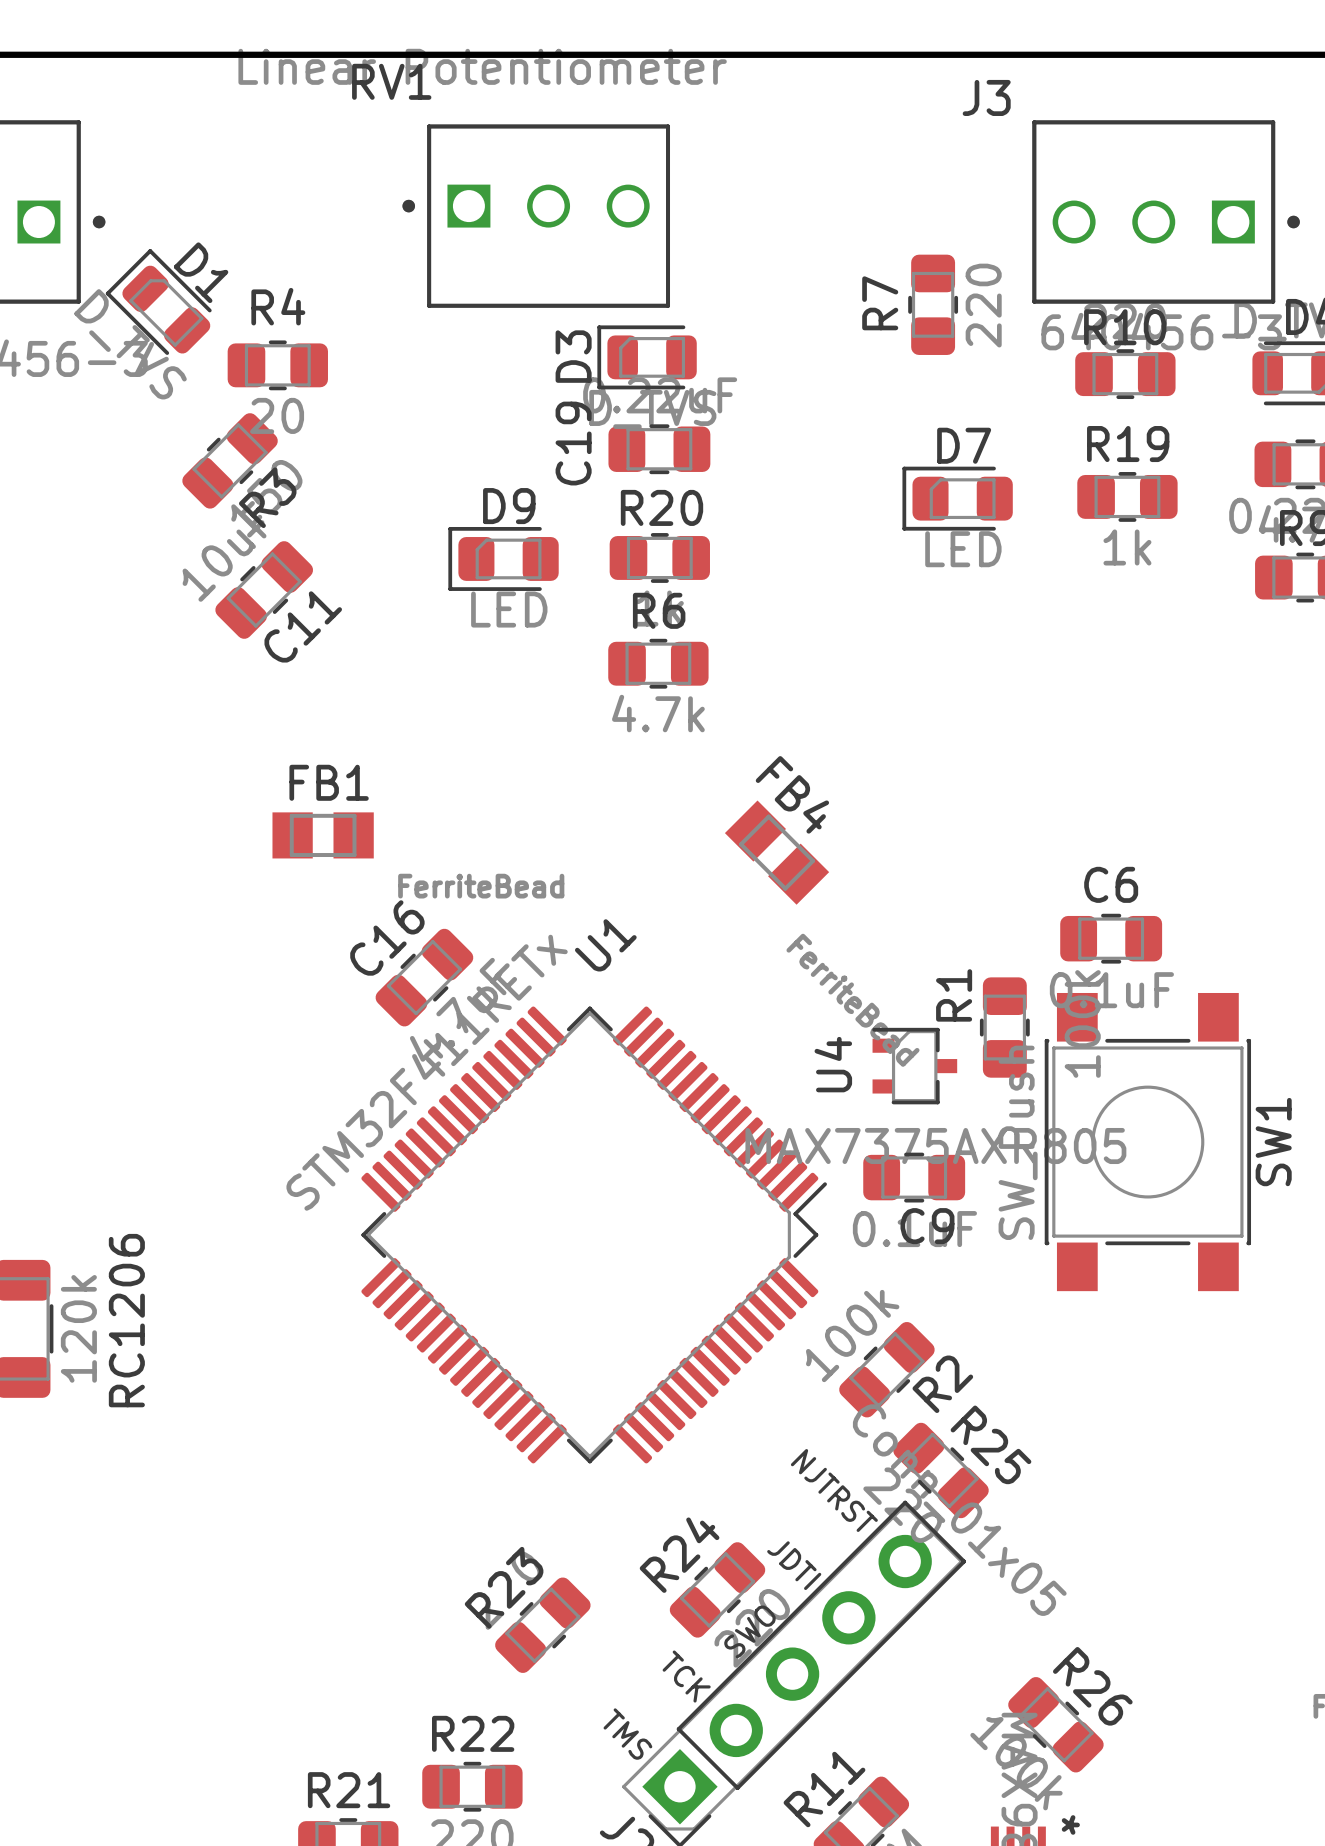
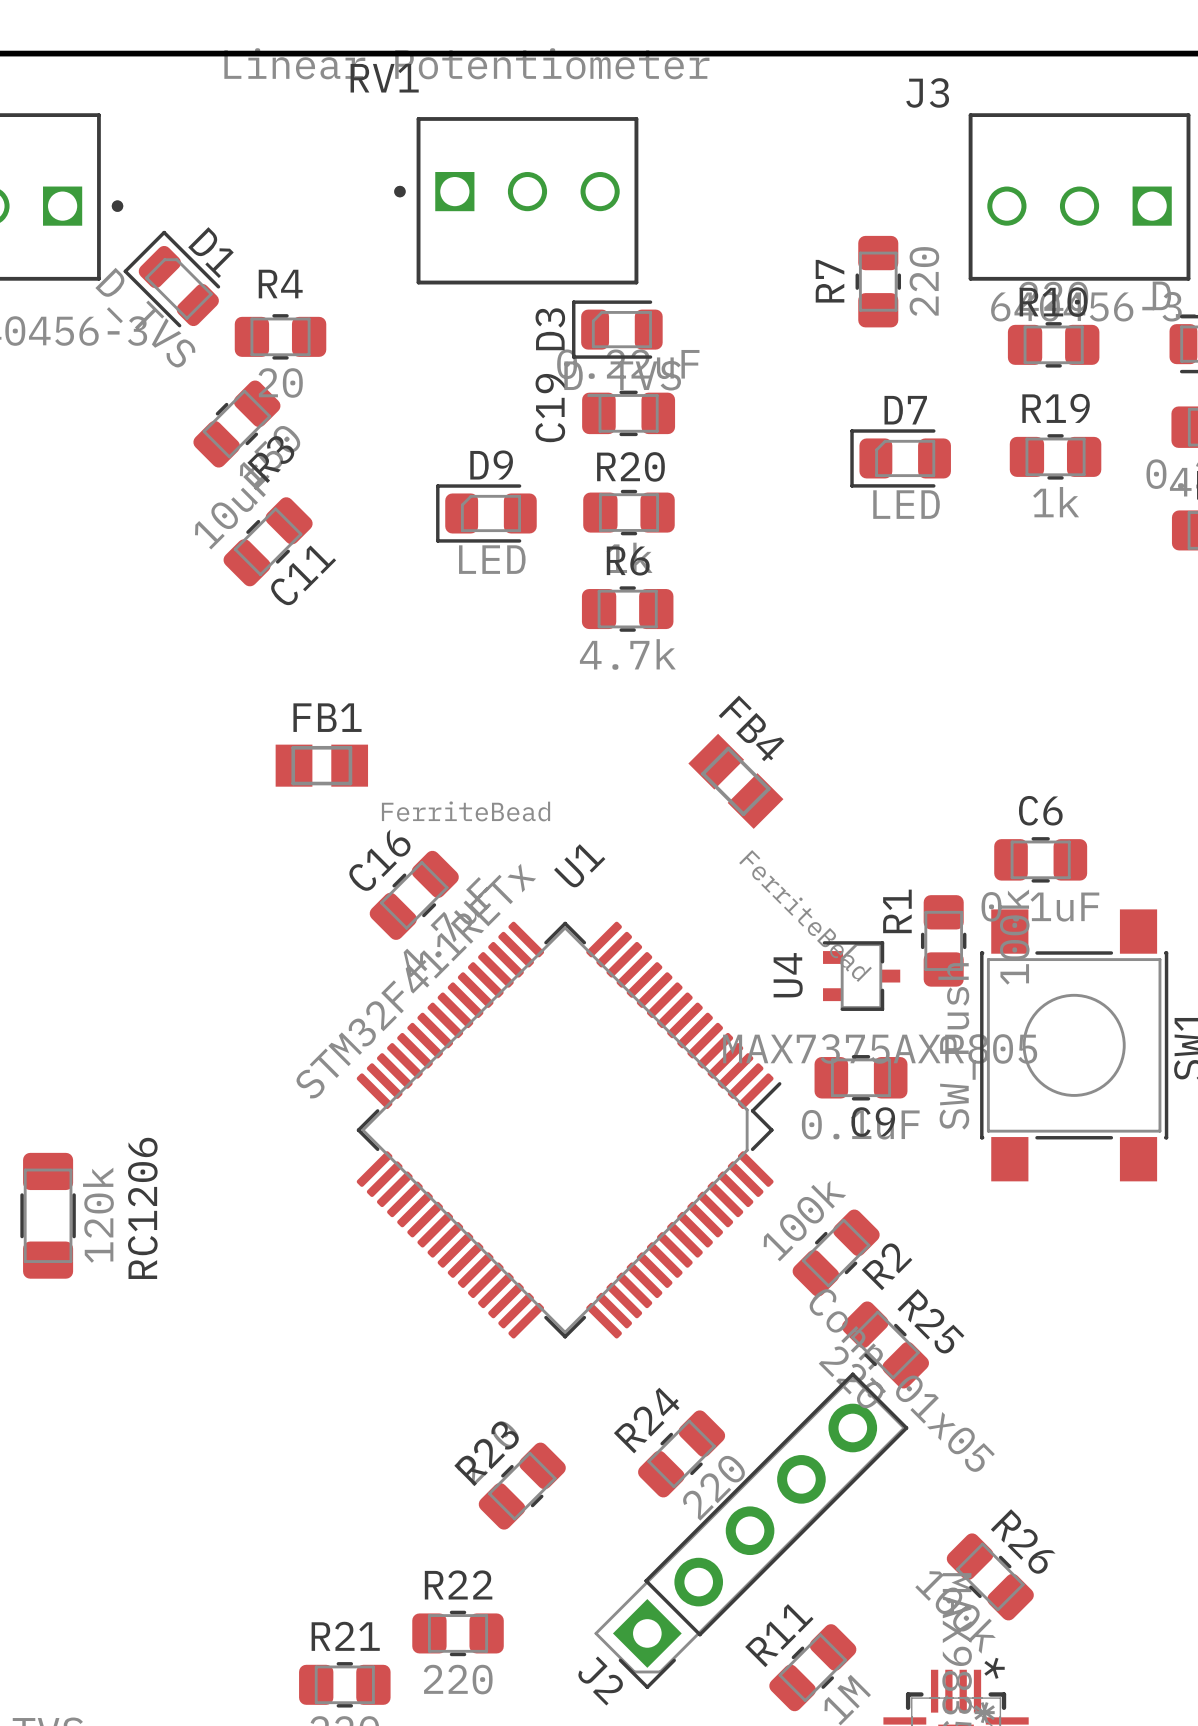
text: NJTRST (834, 1490) -> none
text: JDTI (794, 1565) -> none
text: SWO (749, 1631) -> none
text: TCK (686, 1676) -> none
text: TMS (627, 1734) -> none

